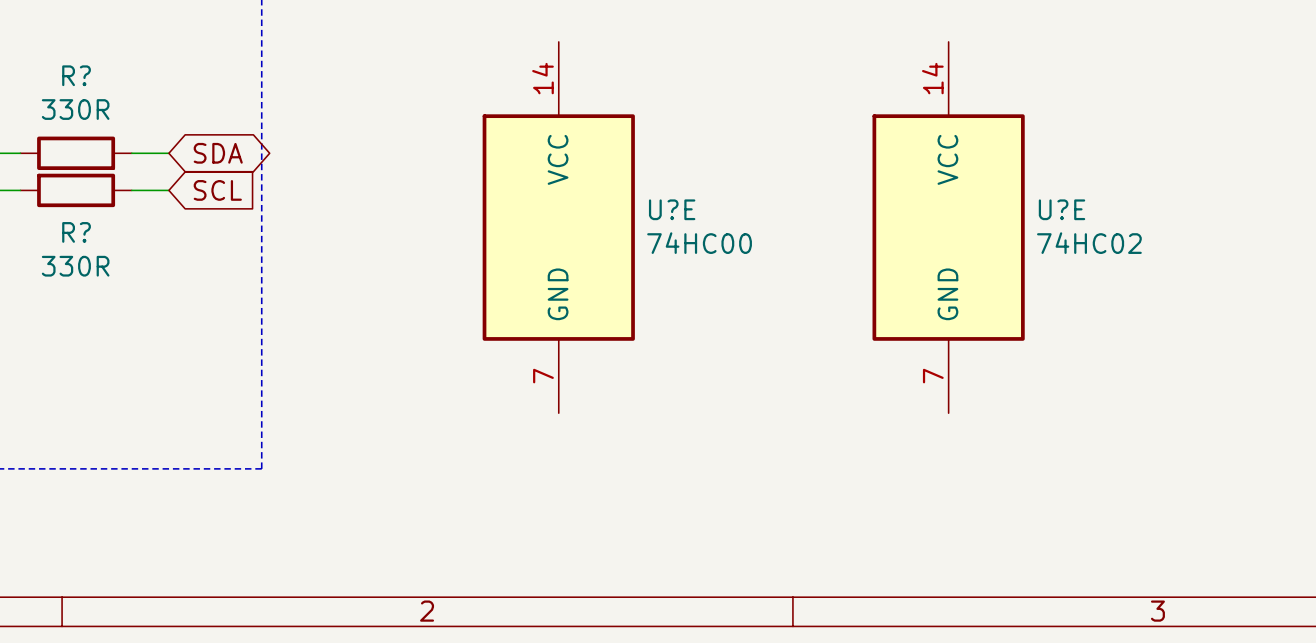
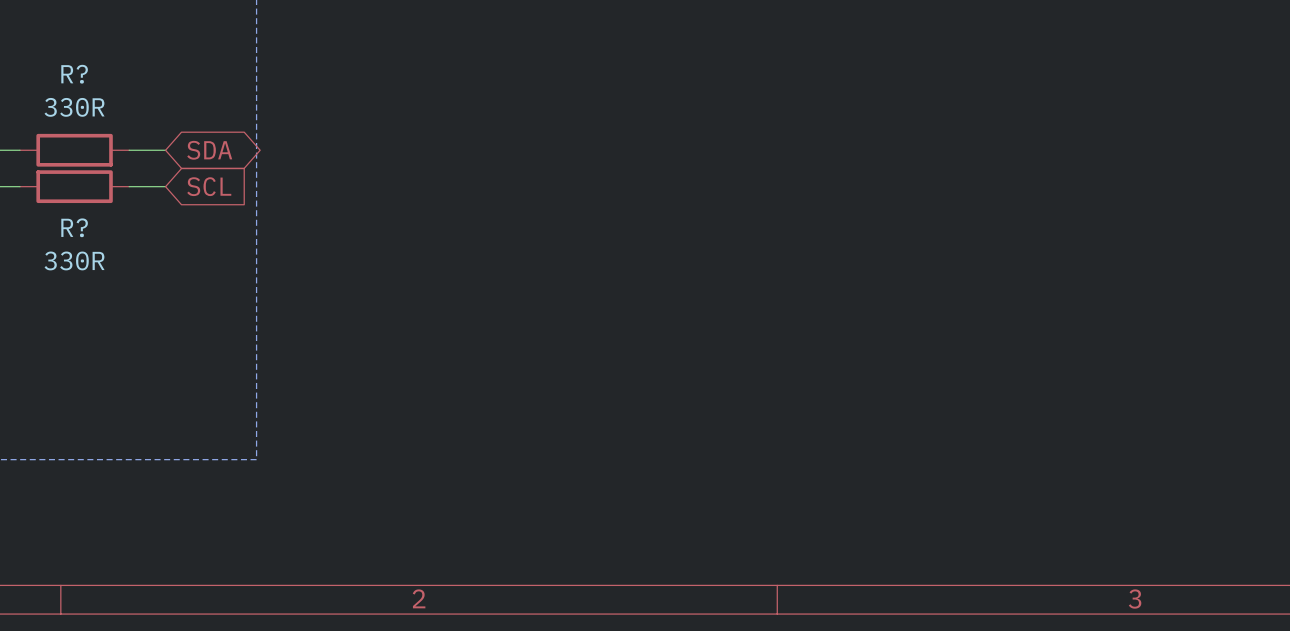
U?E: 74HC00 (558, 227) -> none
U?E: 74HC02 (948, 227) -> none

